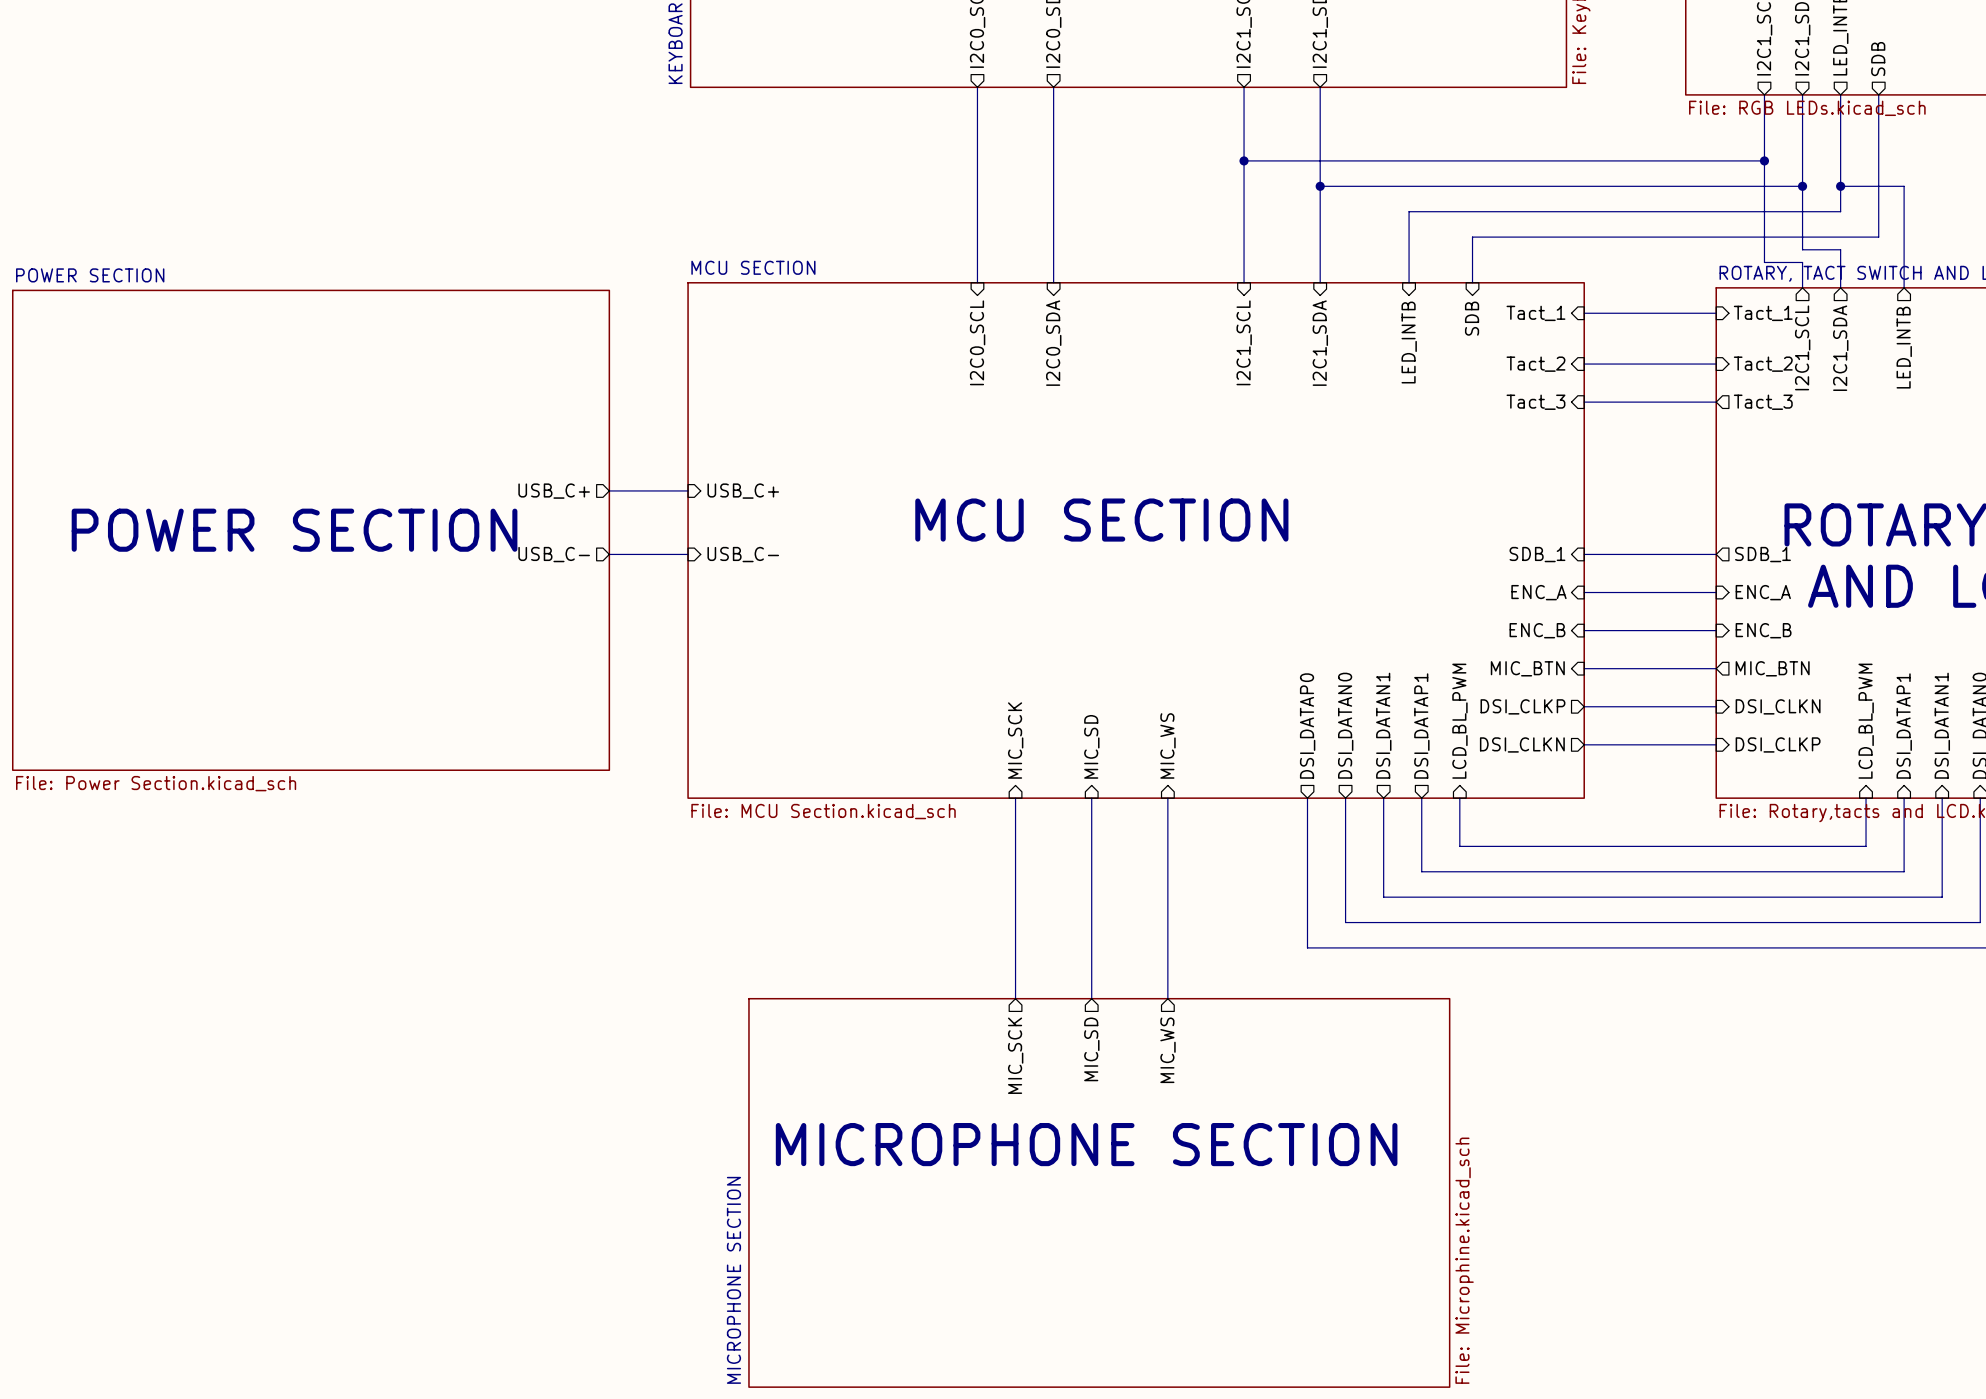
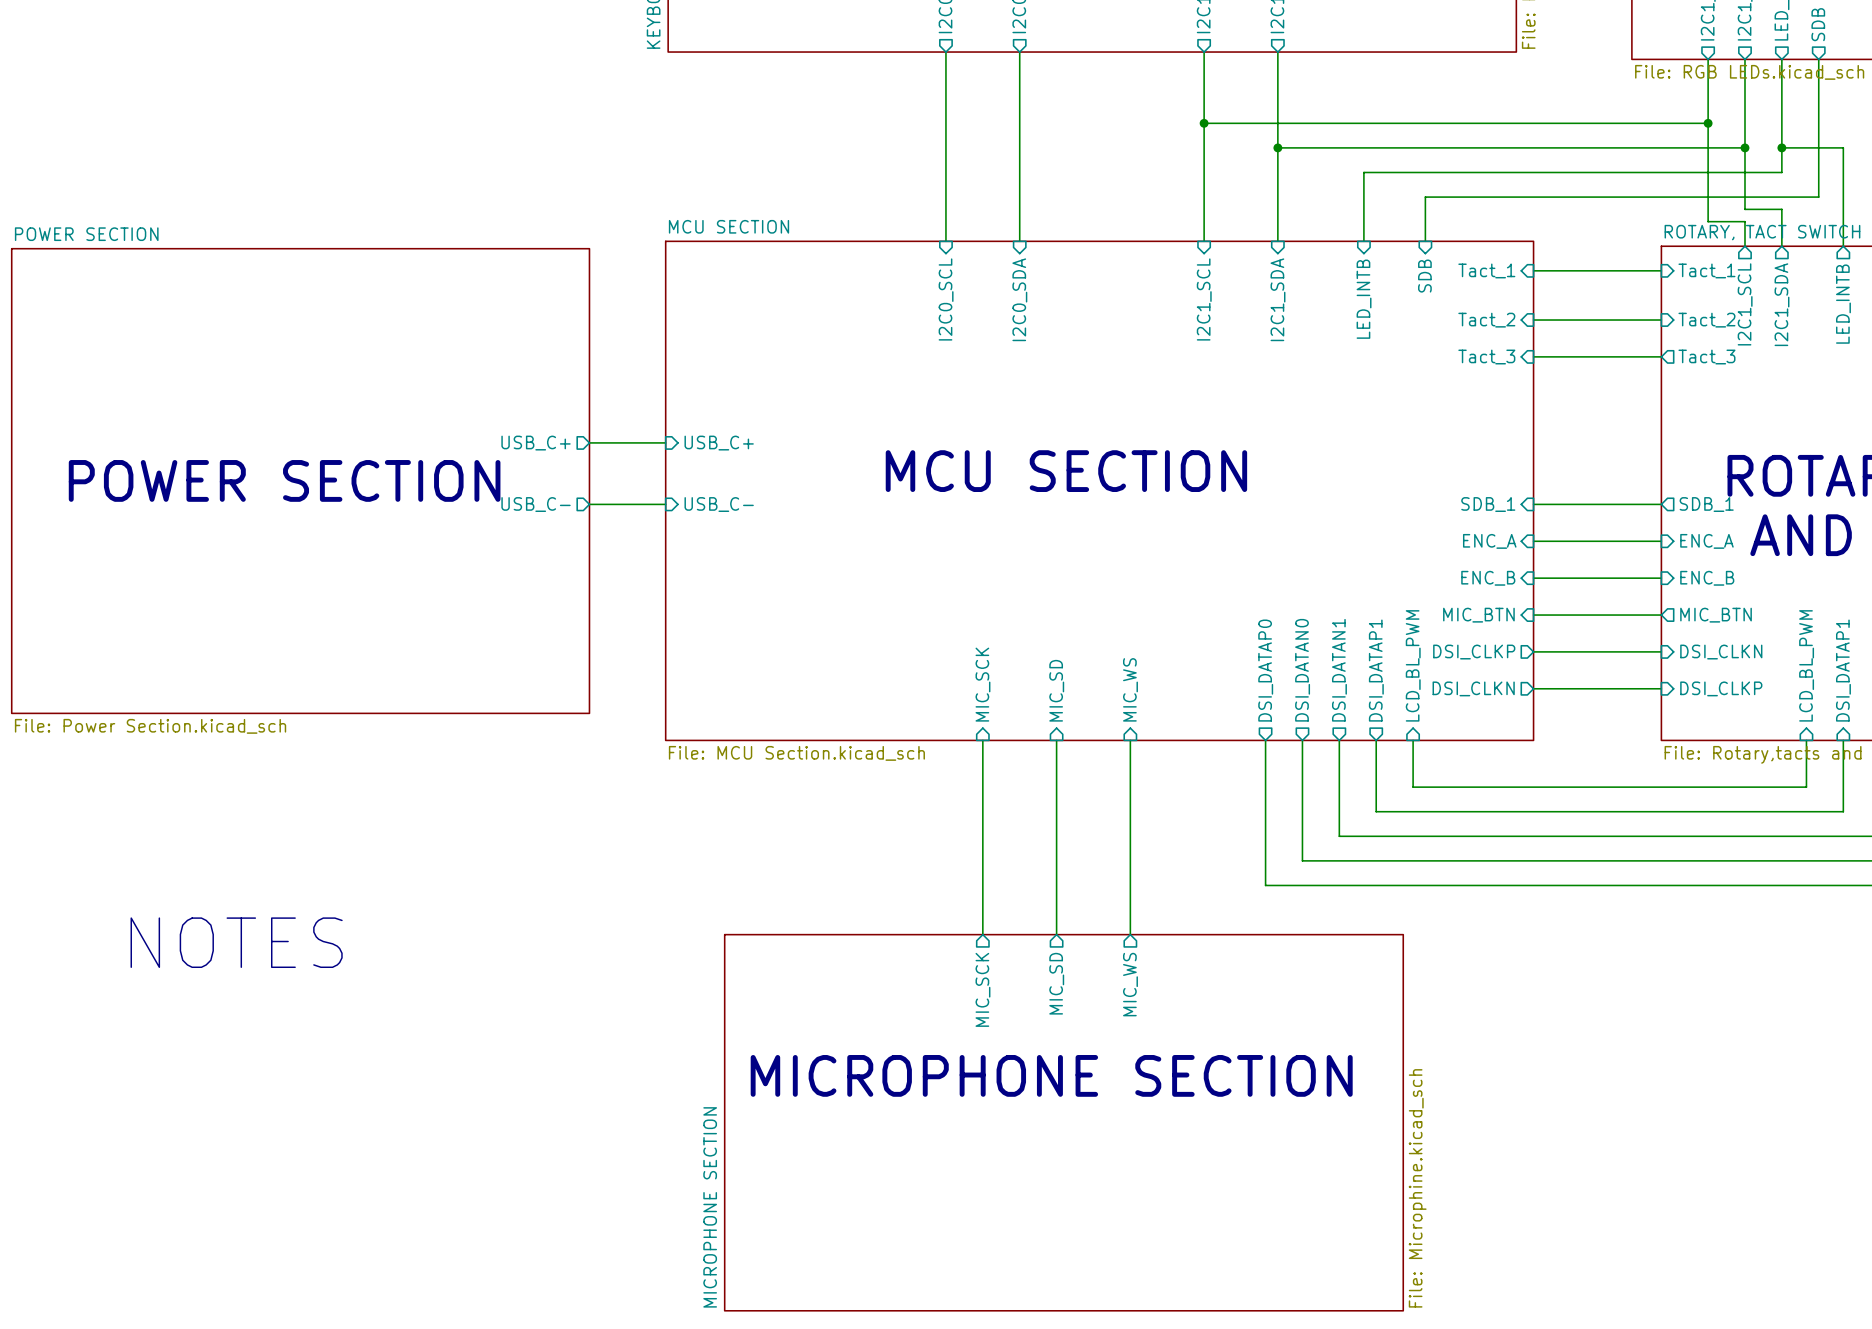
text: none -> NOTES (236, 942)

